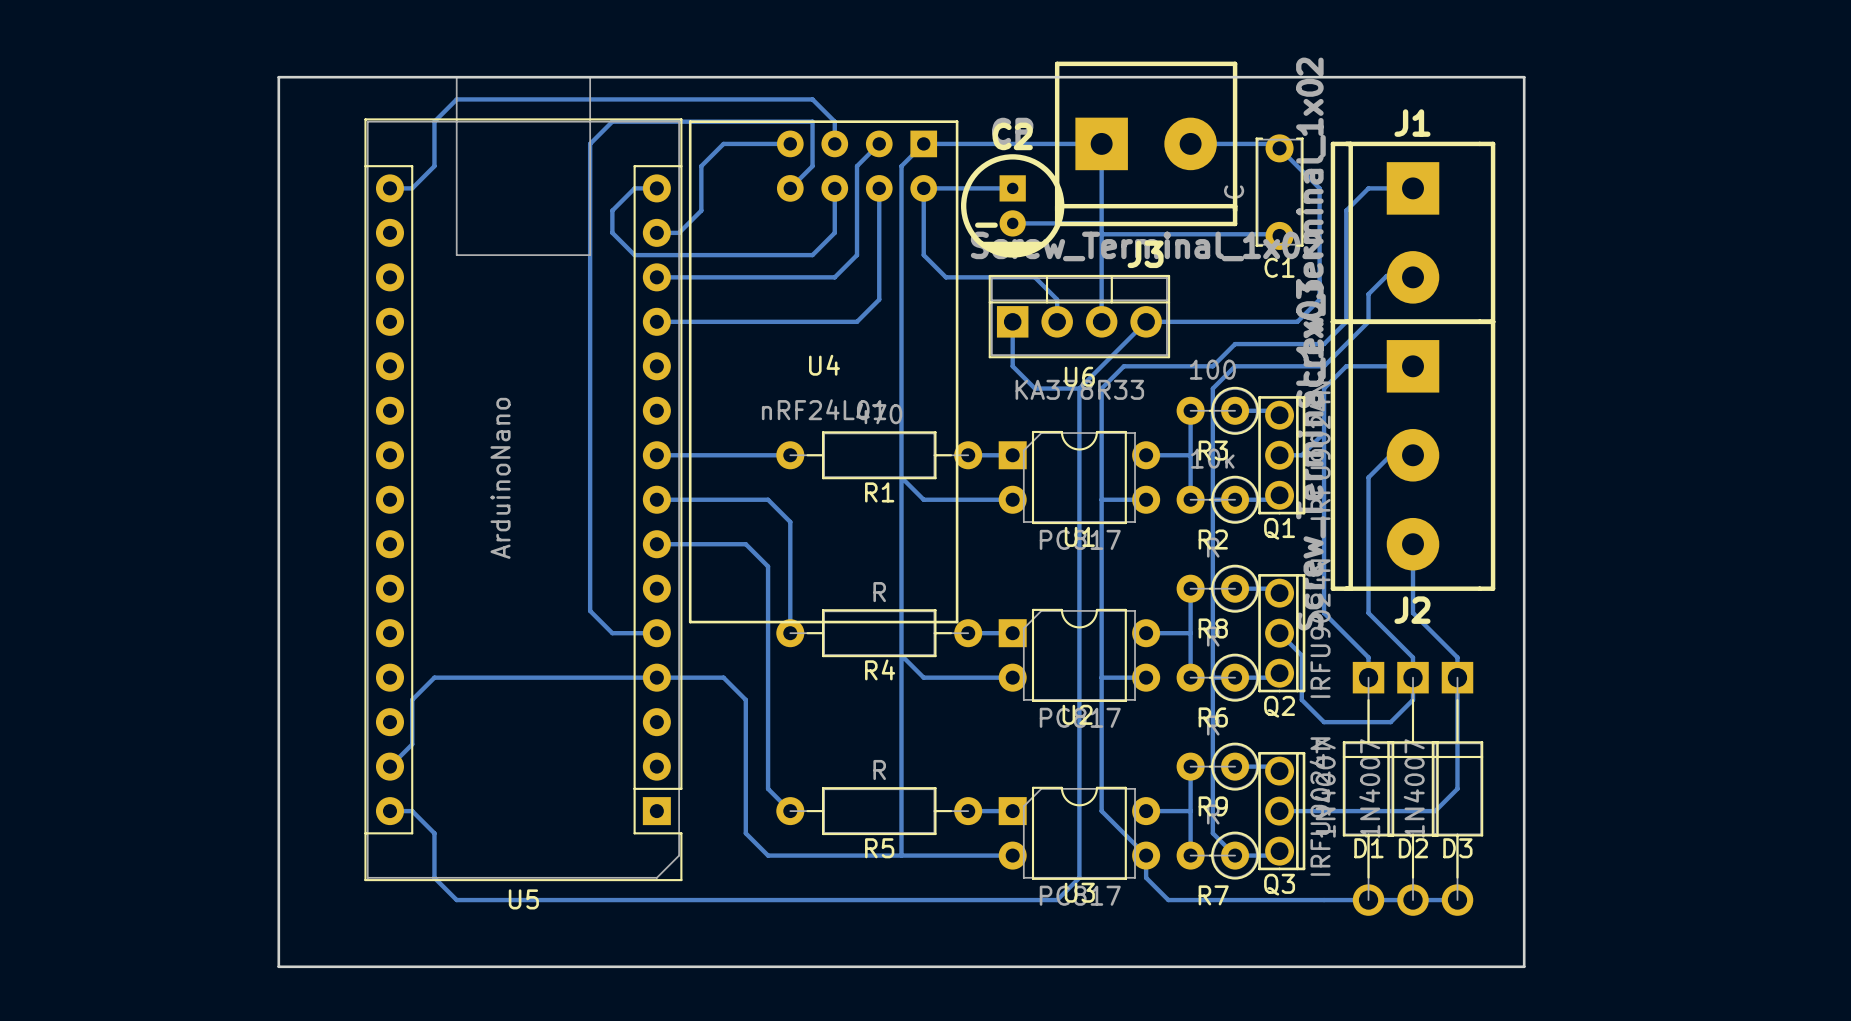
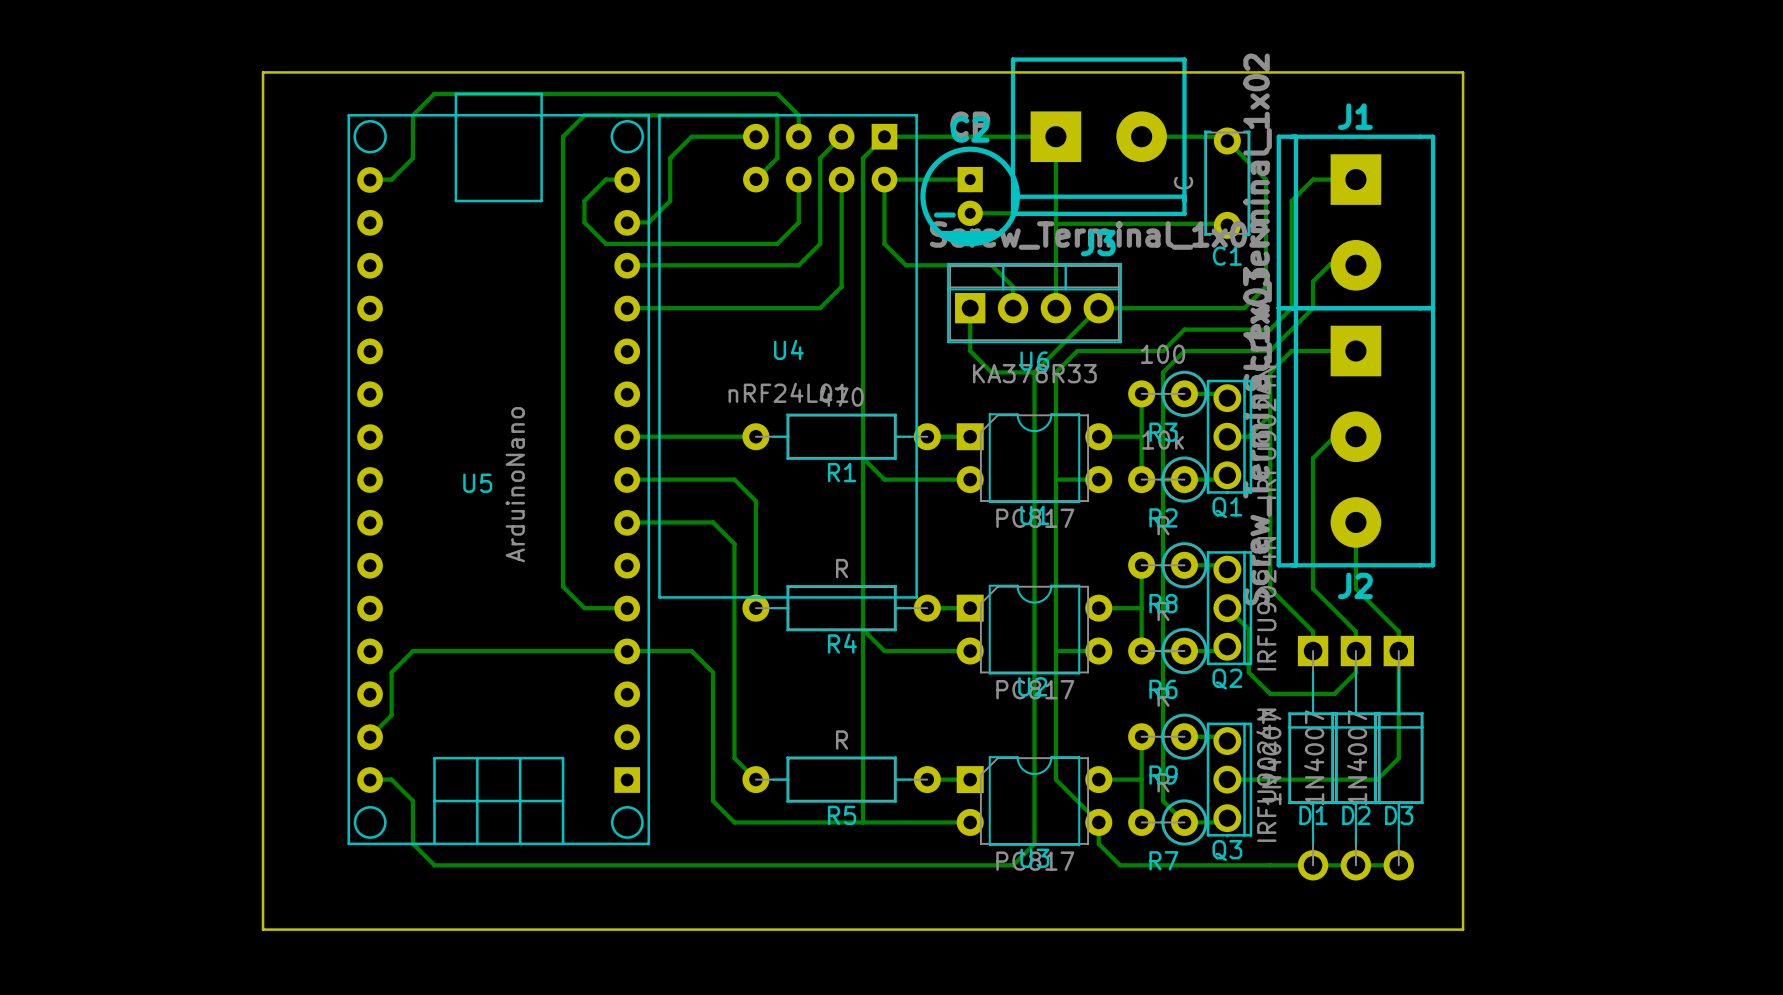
U5 footprint: [364, 76, 683, 882] -> [347, 92, 651, 846]
U5 value position: ArduinoNano (500, 478) -> ArduinoNano (515, 484)
U5 name position: U5 (523, 899) -> U5 (477, 483)

